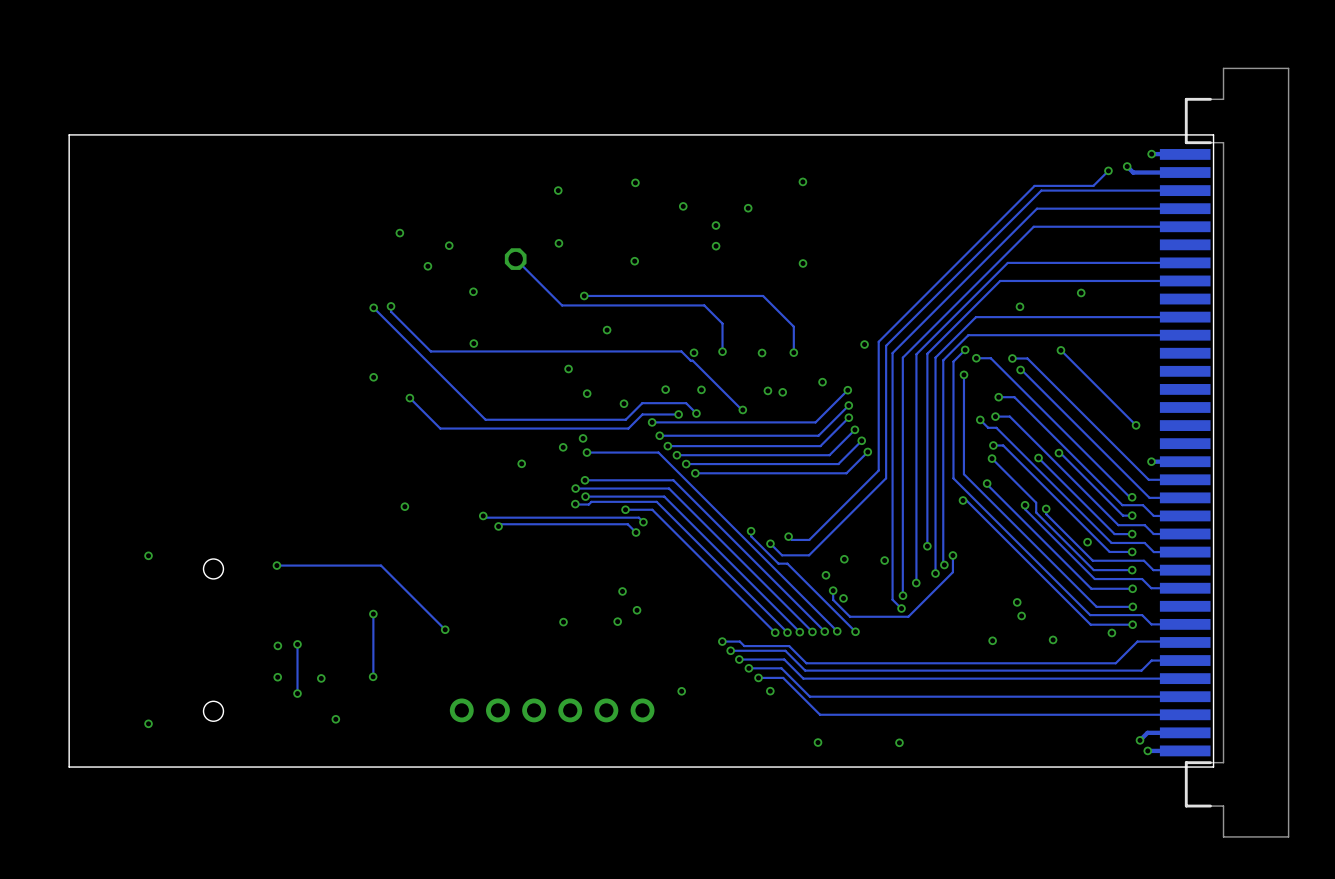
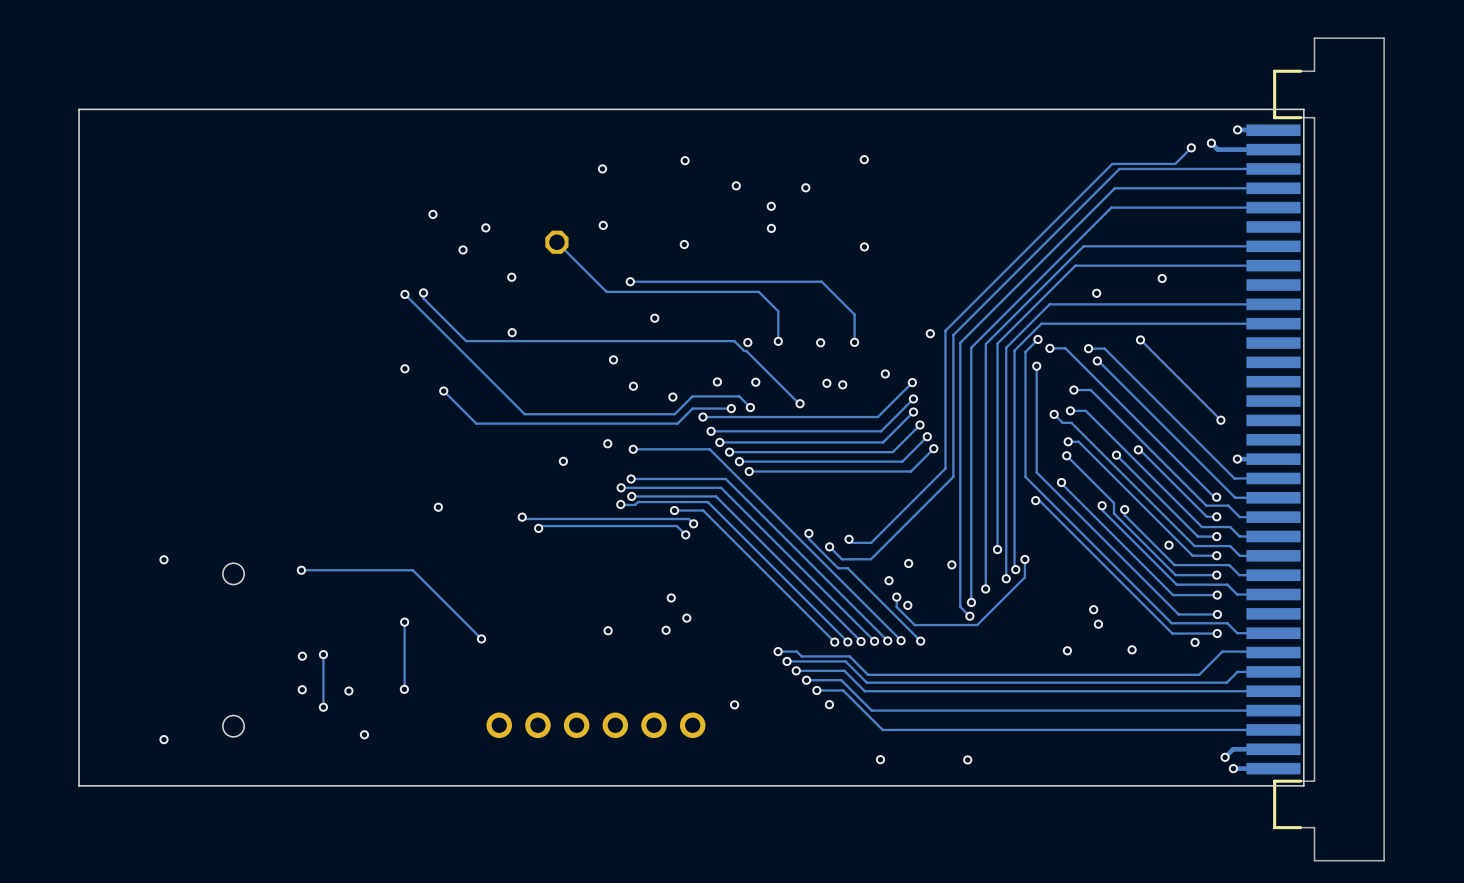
via: (583, 438) -> none

